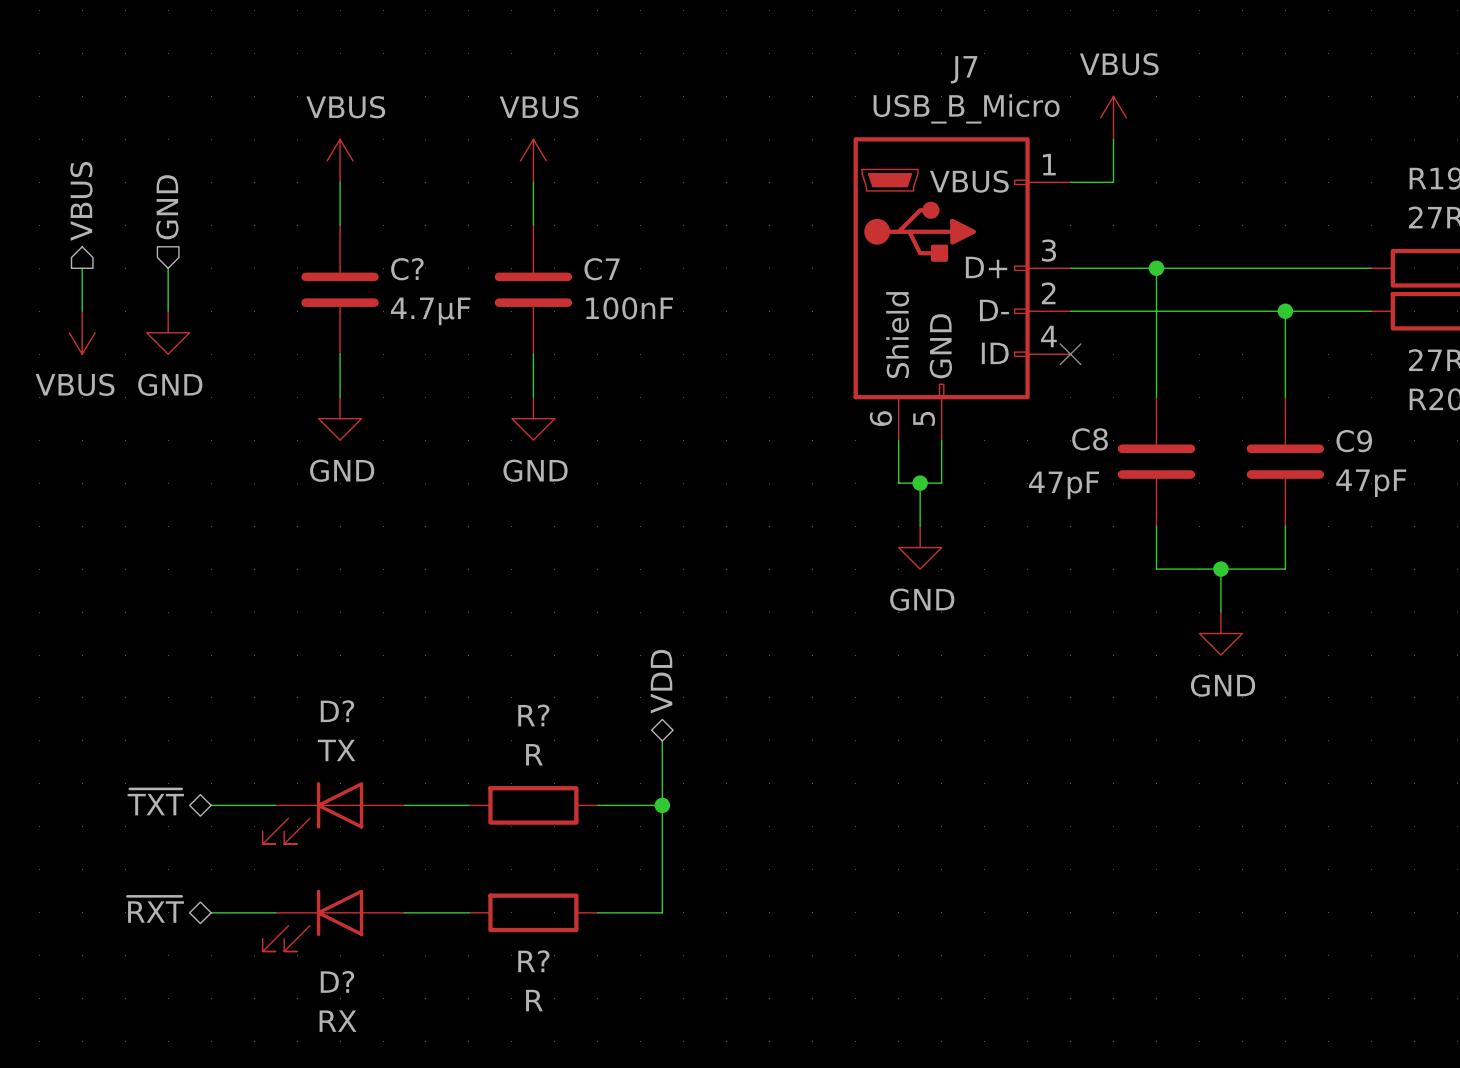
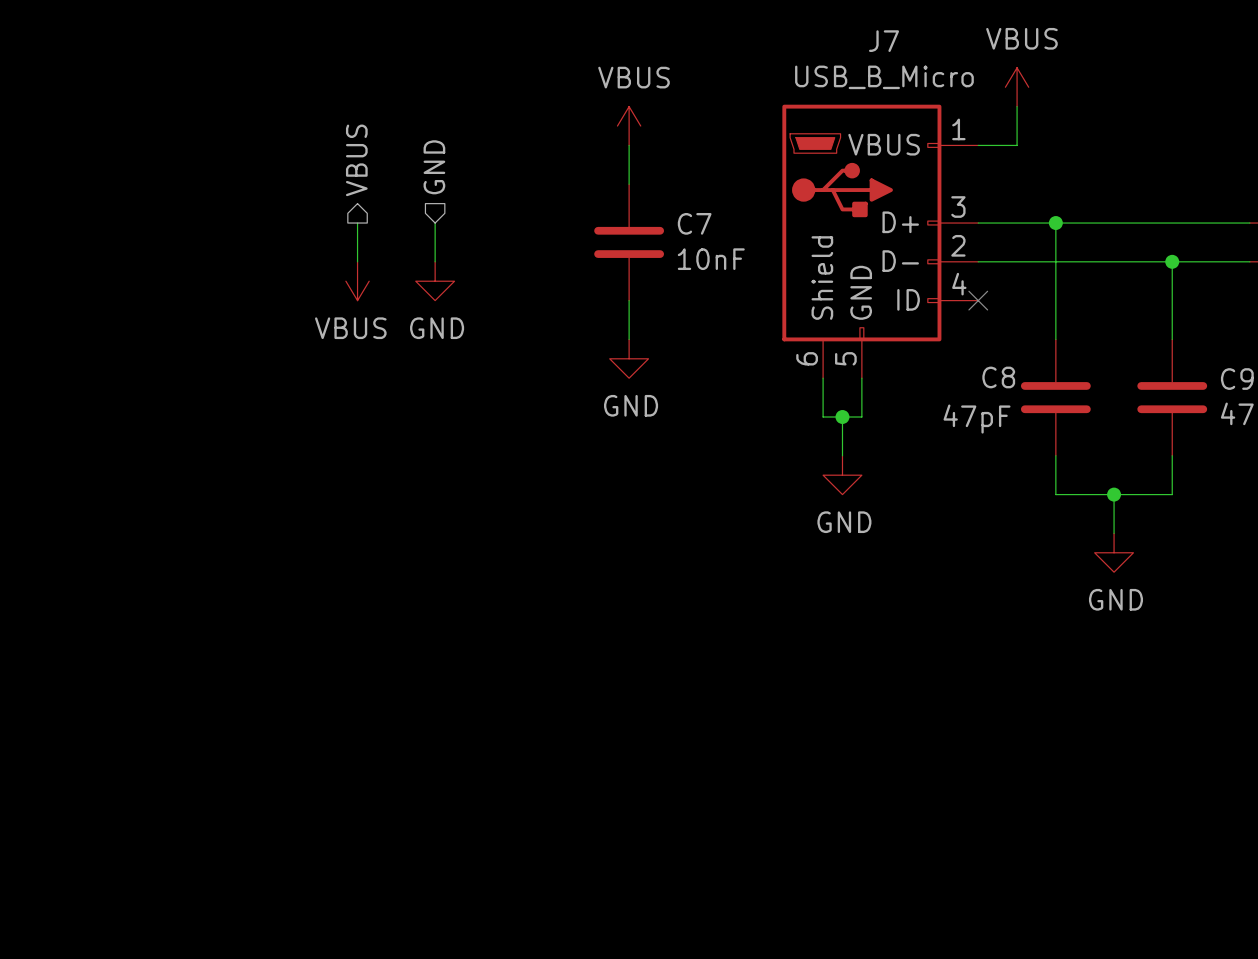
power symbol: VBUS (340, 160) -> none
power symbol: VBUS (533, 160) -> none
power symbol: none -> VBUS (629, 126)
wire: (340, 182) (340, 225) -> none
wire: (533, 182) (533, 225) -> (629, 145) (629, 184)
hierarchical label position: VBUS (81, 201) -> VBUS (356, 160)
hierarchical label position: GND (167, 207) -> GND (434, 167)
wire: (82, 268) (82, 311) -> (357, 223) (357, 261)
wire: (168, 268) (168, 311) -> (435, 223) (435, 261)
C?: 4.7μF (340, 289) -> none
C7 position: (533, 289) -> (629, 242)
C7 value: 100nF (629, 308) -> 10nF (711, 259)
power symbol: VBUS (82, 332) -> none
power symbol: GND (168, 332) -> none
power symbol: none -> VBUS (357, 281)
power symbol: none -> GND (435, 281)
wire: (340, 354) (340, 397) -> none
wire: (533, 354) (533, 397) -> (629, 300) (629, 339)
power symbol: GND (340, 418) -> none
power symbol: GND (533, 418) -> none
power symbol: none -> GND (629, 358)
hierarchical label: VDD (661, 681) -> none
wire: (662, 740) (662, 912) (597, 912) -> none
hierarchical label: ~{TXT} (155, 802) -> none
wire: (211, 805) (275, 805) -> none
wire: (404, 805) (468, 805) -> none
R?: R (533, 805) -> none
wire: (597, 805) (662, 805) -> none
junction: (662, 805) -> none
D?: TX (333, 813) -> none
hierarchical label: ~{RXT} (155, 909) -> none
wire: (211, 912) (275, 912) -> none
wire: (404, 912) (468, 912) -> none
R?: R (533, 912) -> none
D?: RX (333, 920) -> none

